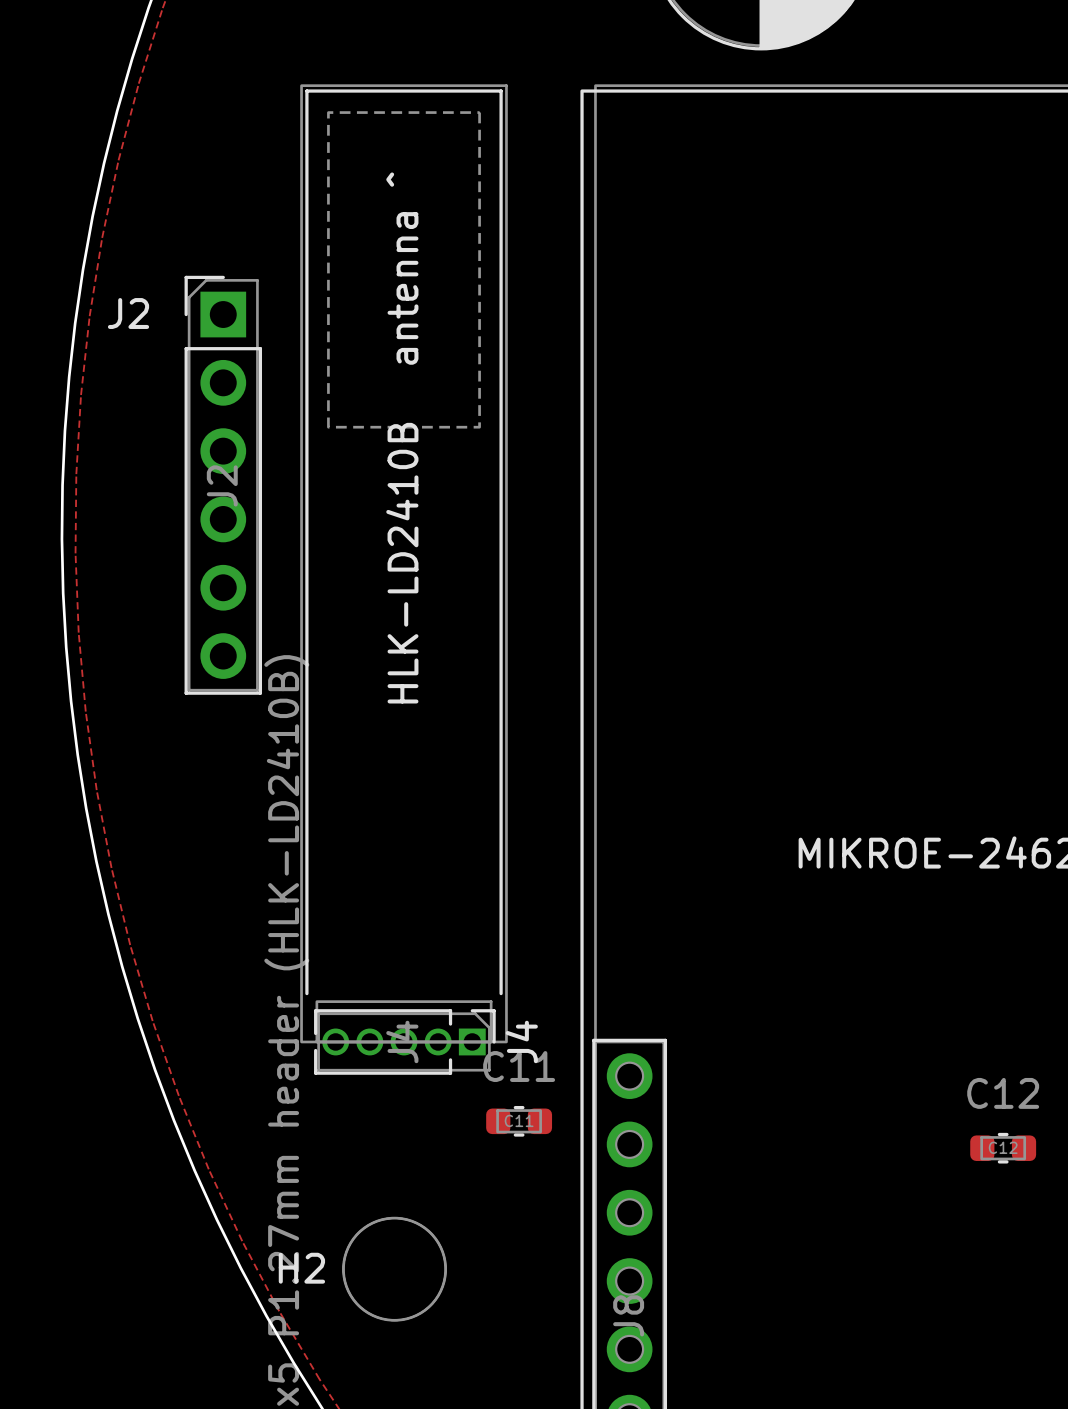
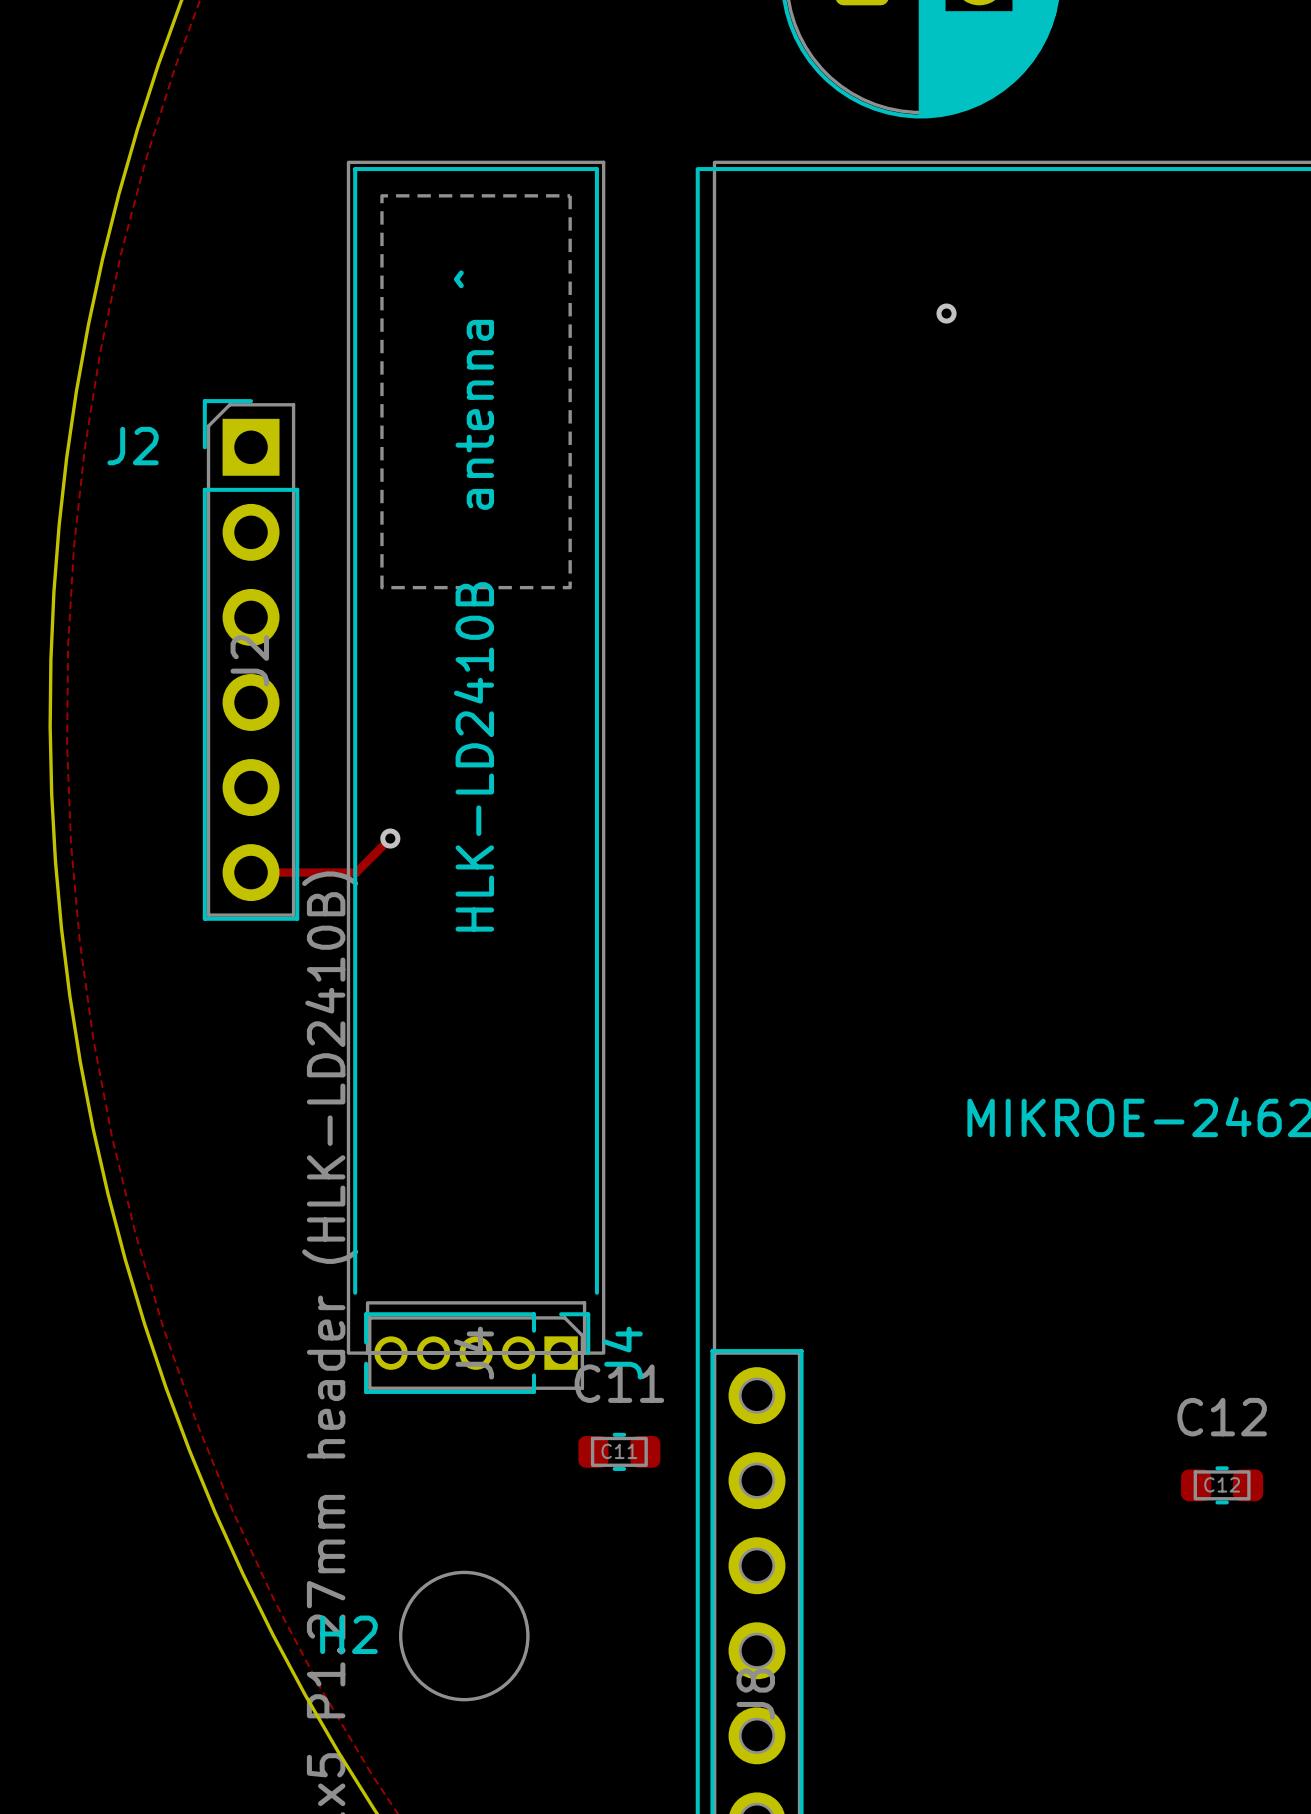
via: none -> (946, 313)
track: none -> (390, 838) (356, 872) (251, 872)
via: none -> (390, 838)

